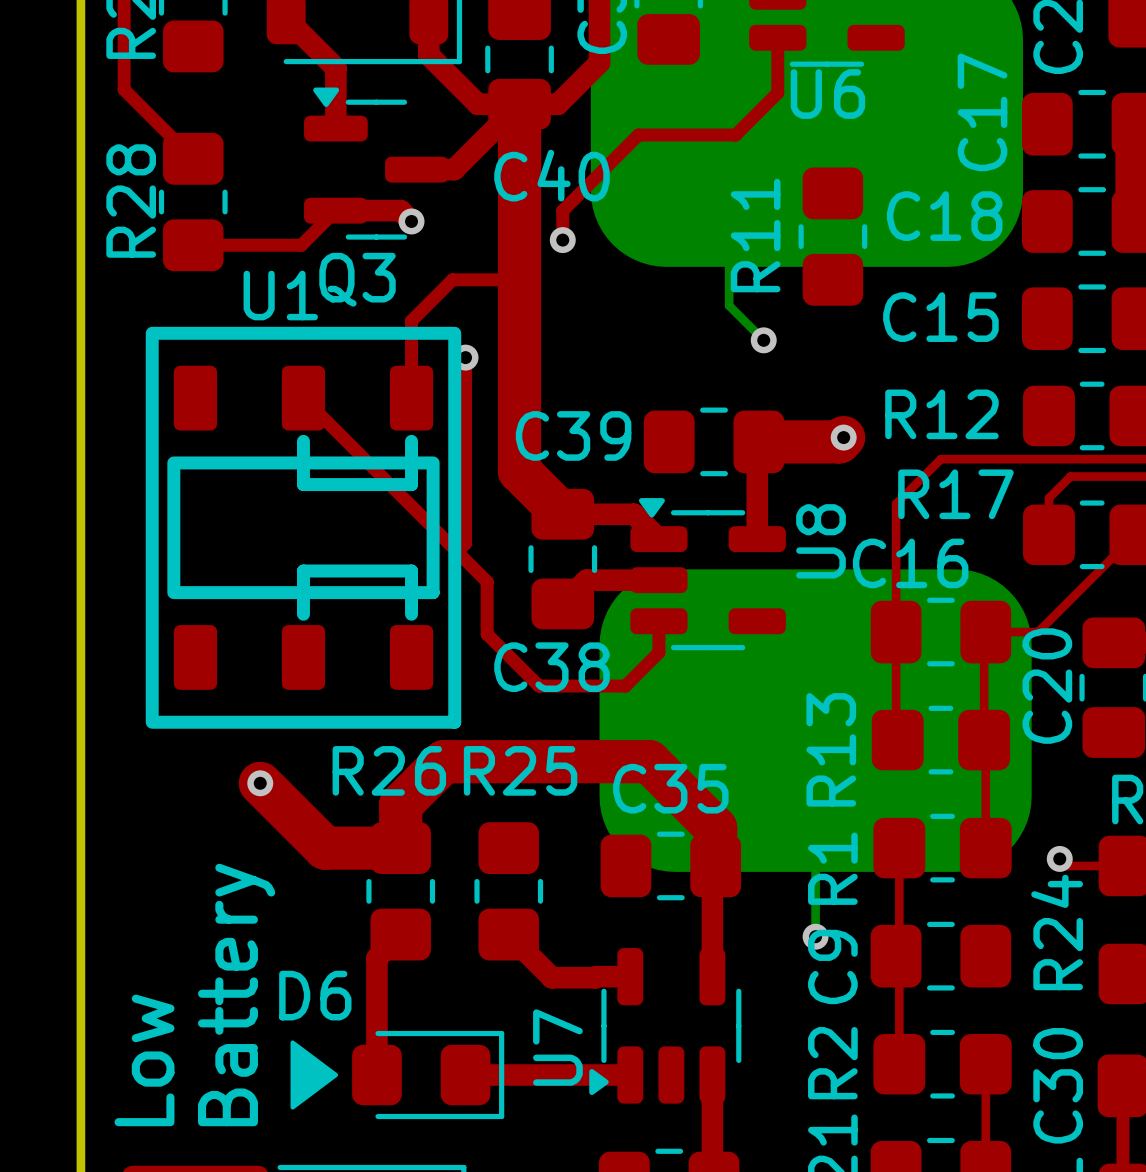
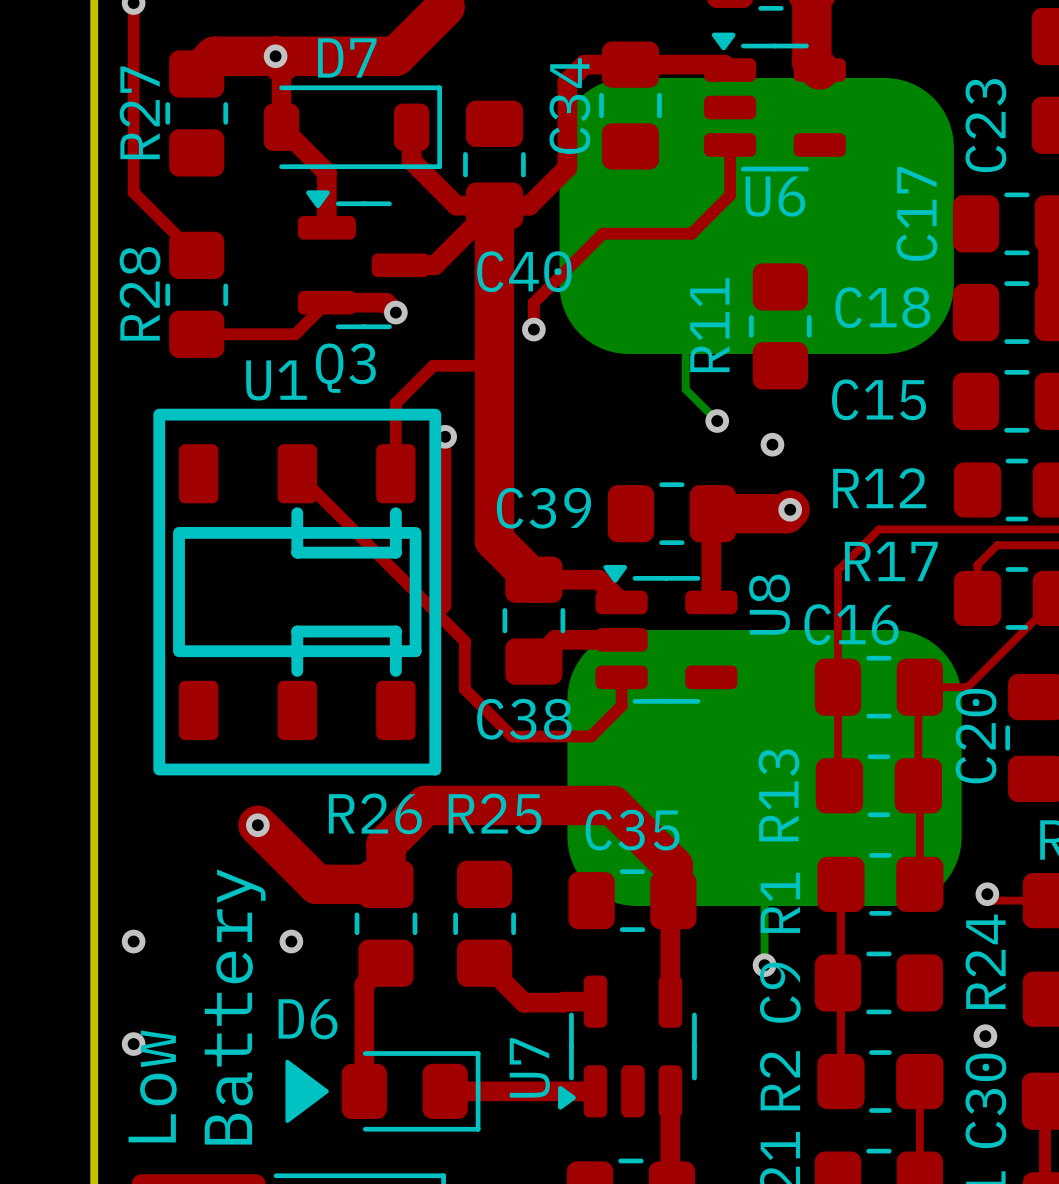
via: none -> (772, 444)
via: none -> (133, 941)
via: none -> (291, 941)
via: none -> (985, 1036)
via: none -> (133, 1044)

